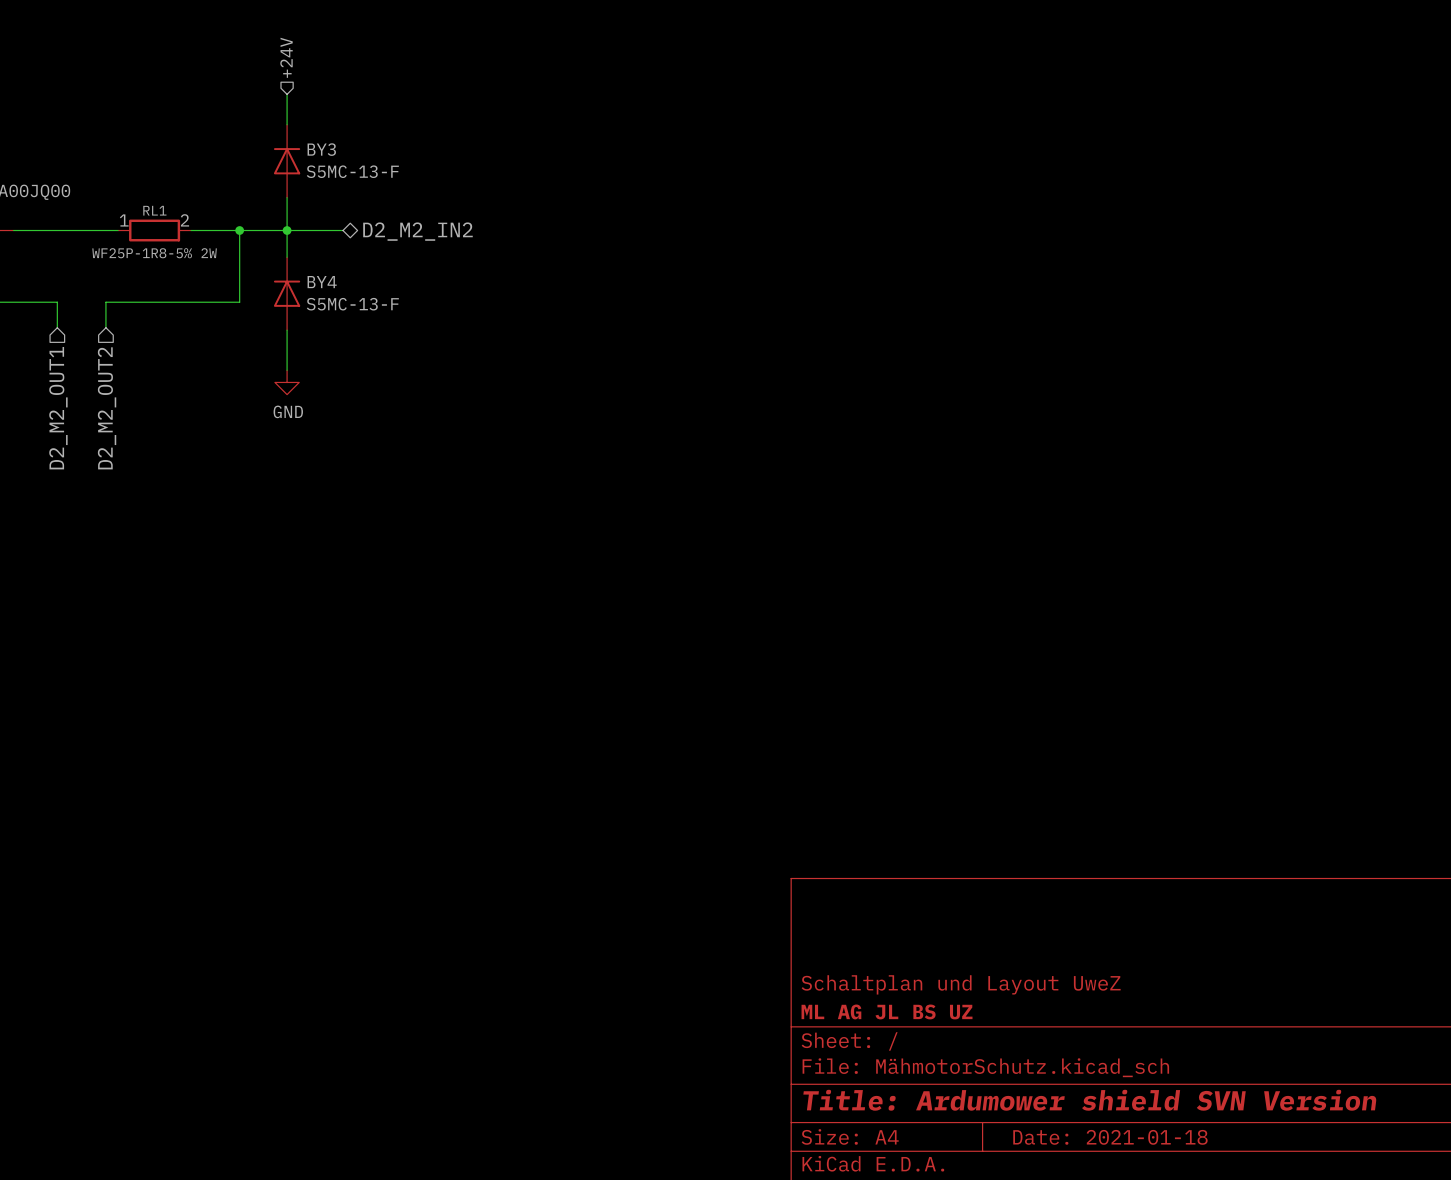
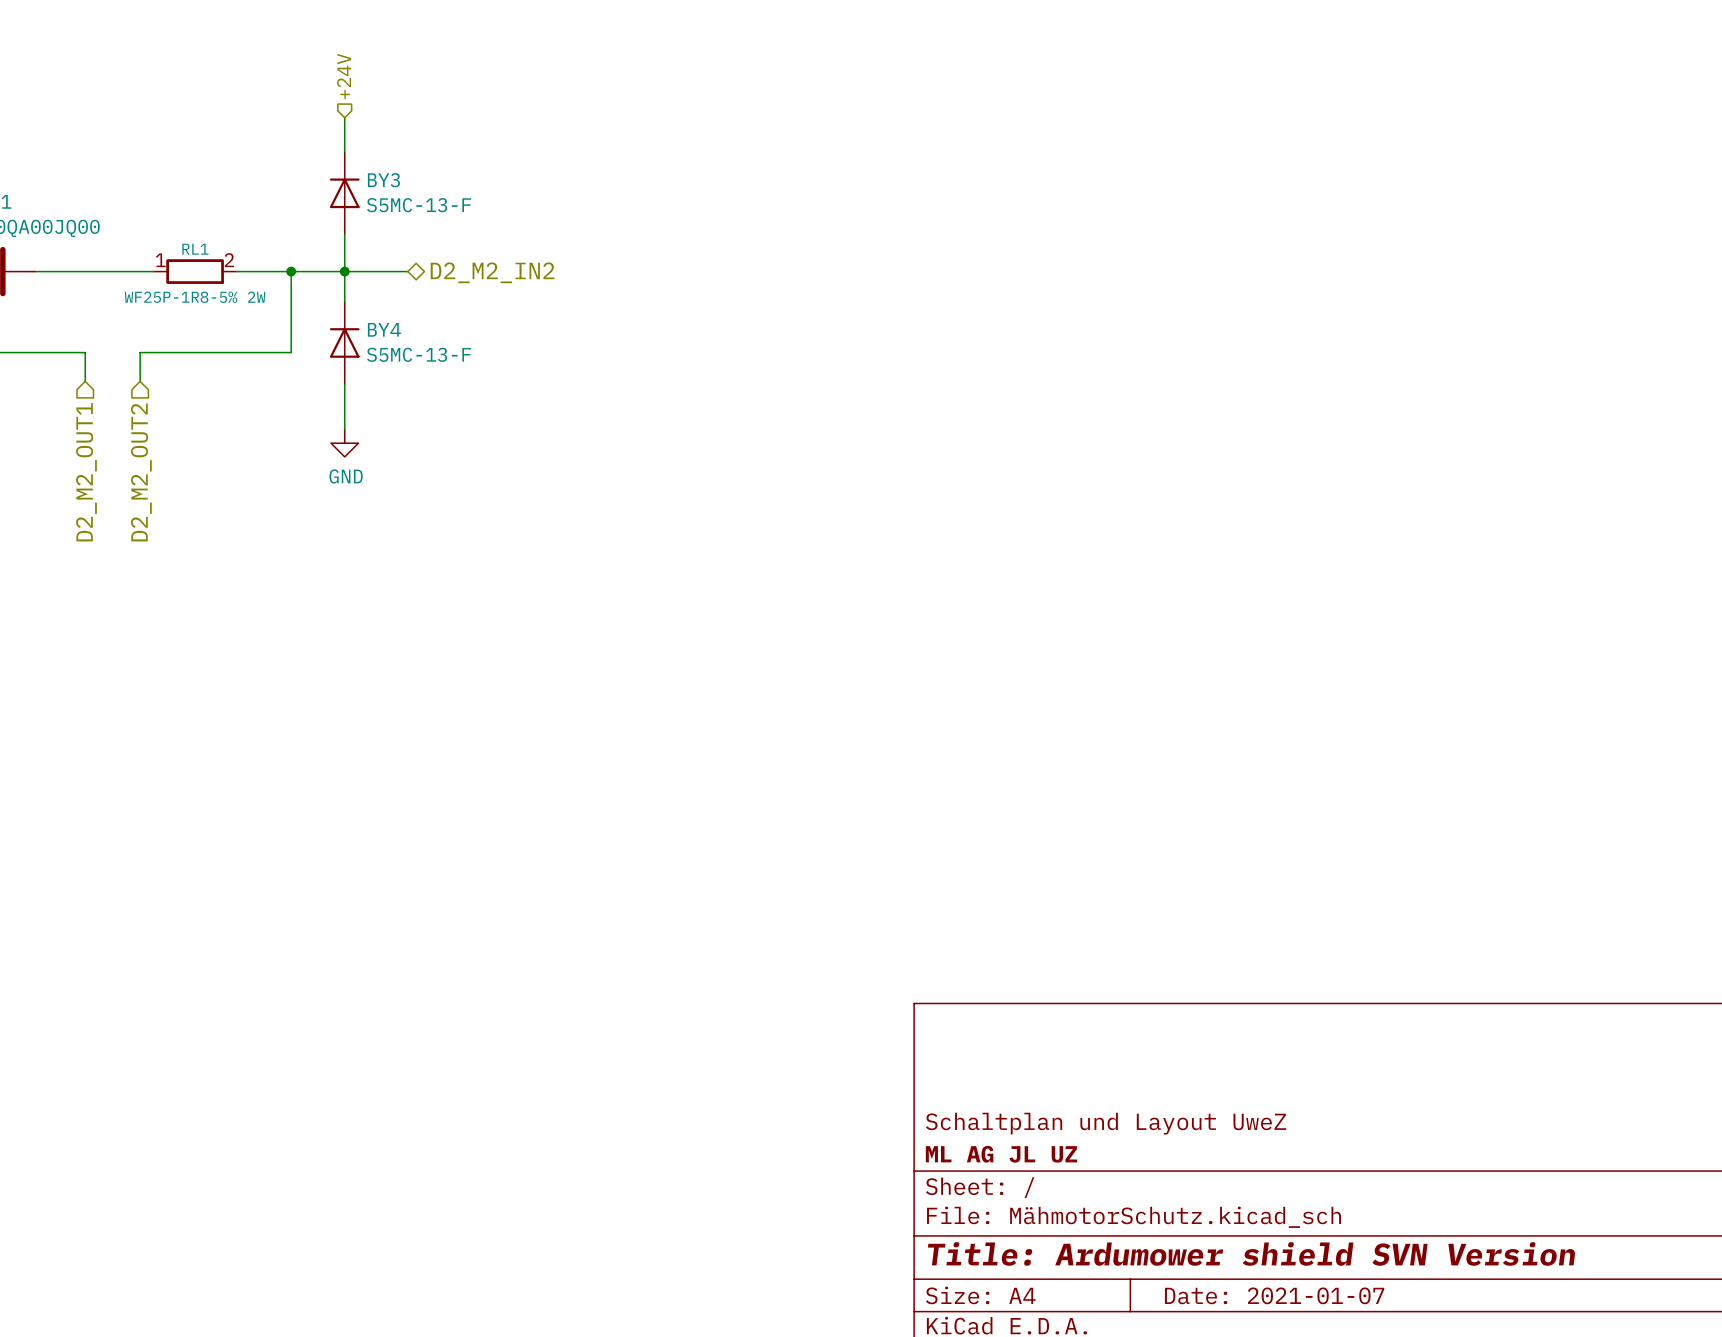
title block: ML AG JL BS UZ (887, 1011) -> ML AG JL UZ (1001, 1154)
title block: Date: 2021-01-18 (1110, 1137) -> Date: 2021-01-07 (1274, 1295)

